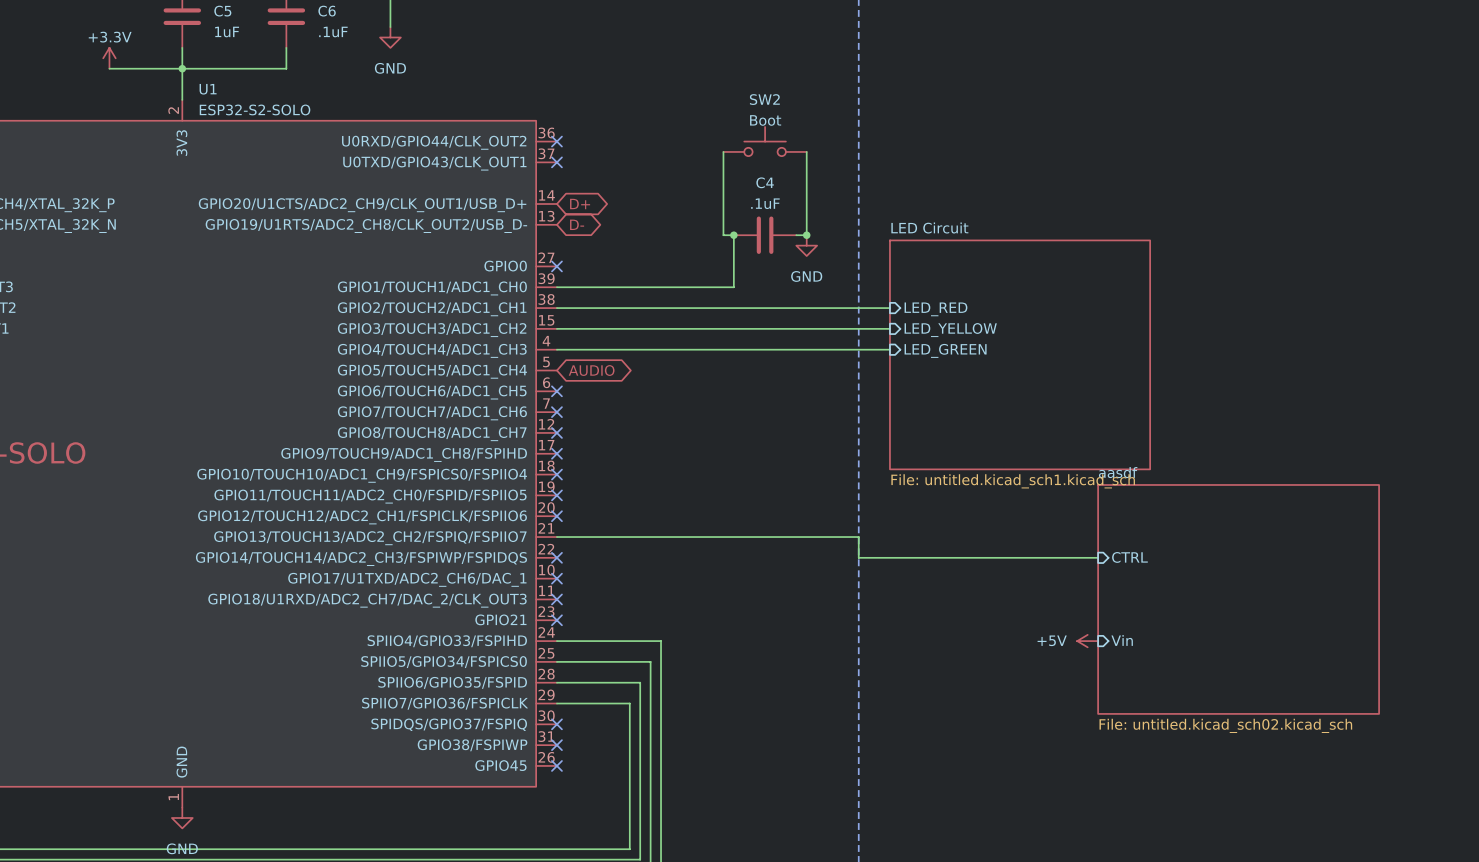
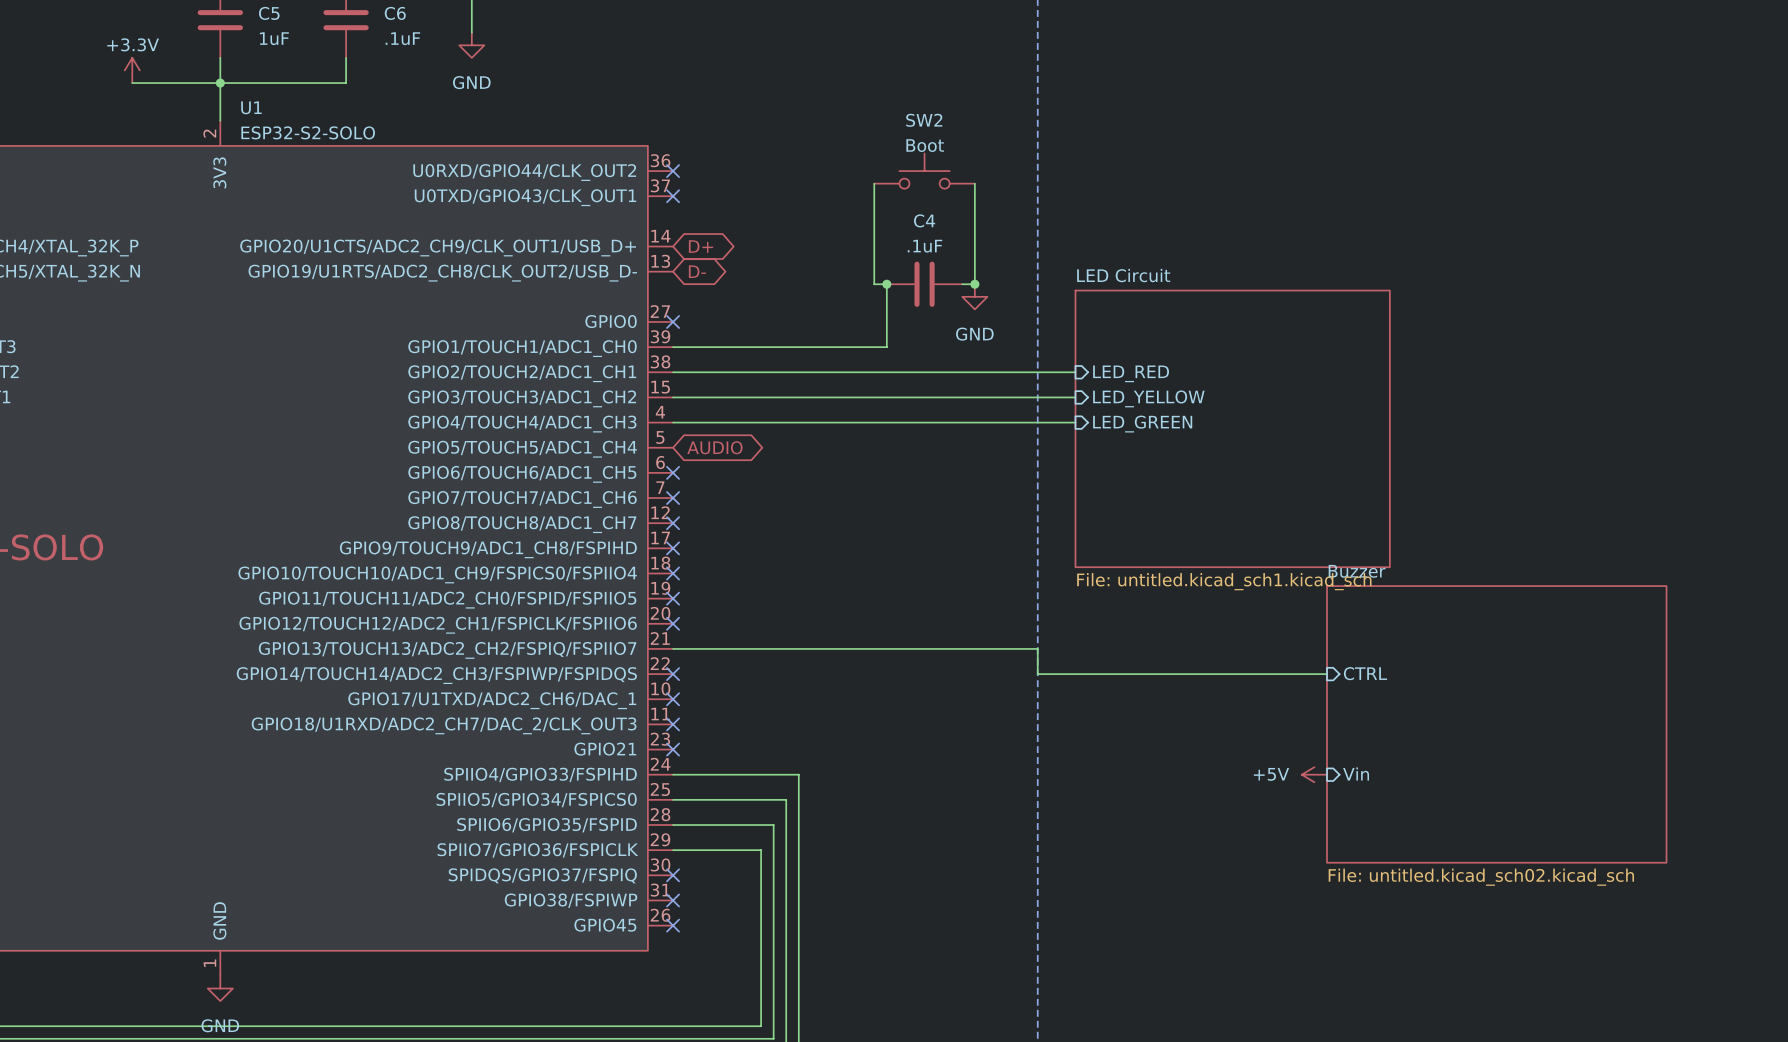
sheet aasdf name: aasdf (1118, 472) -> Buzzer (1357, 571)

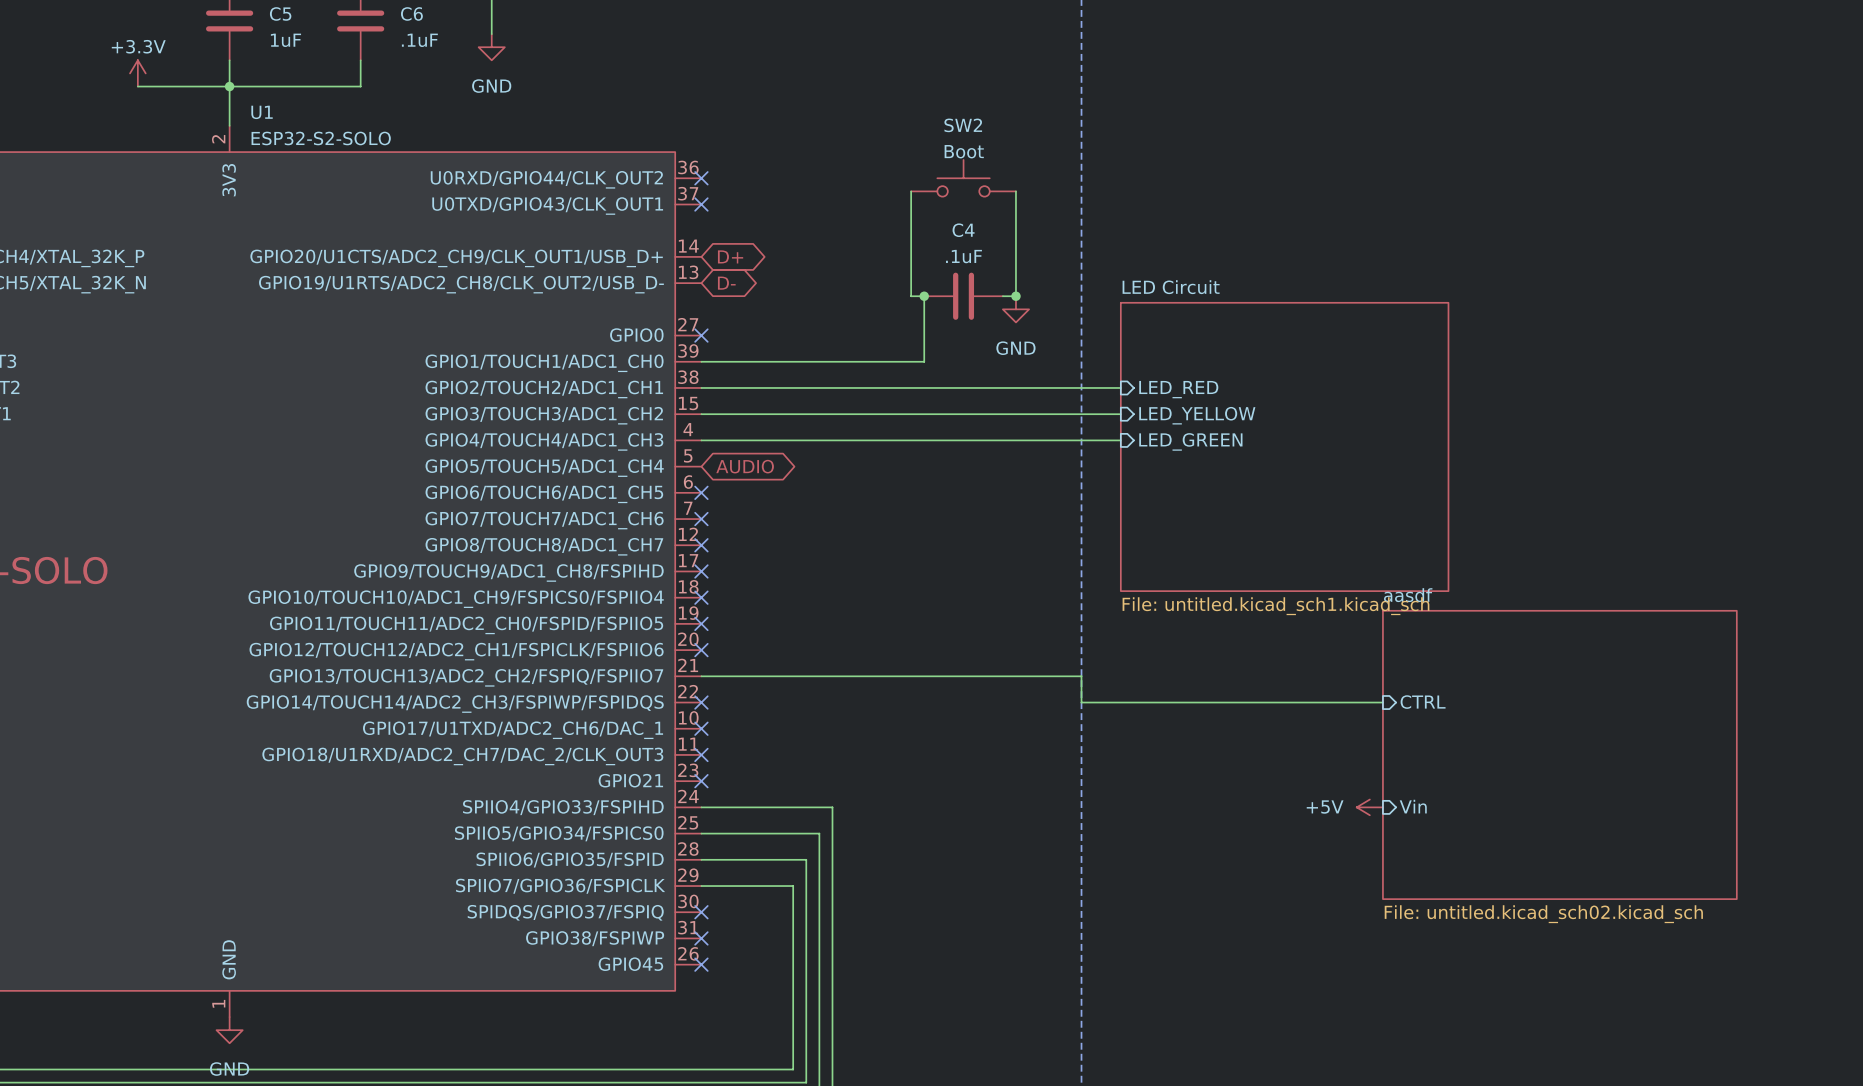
sheet Buzzer name: Buzzer (1357, 571) -> aasdf (1408, 595)

